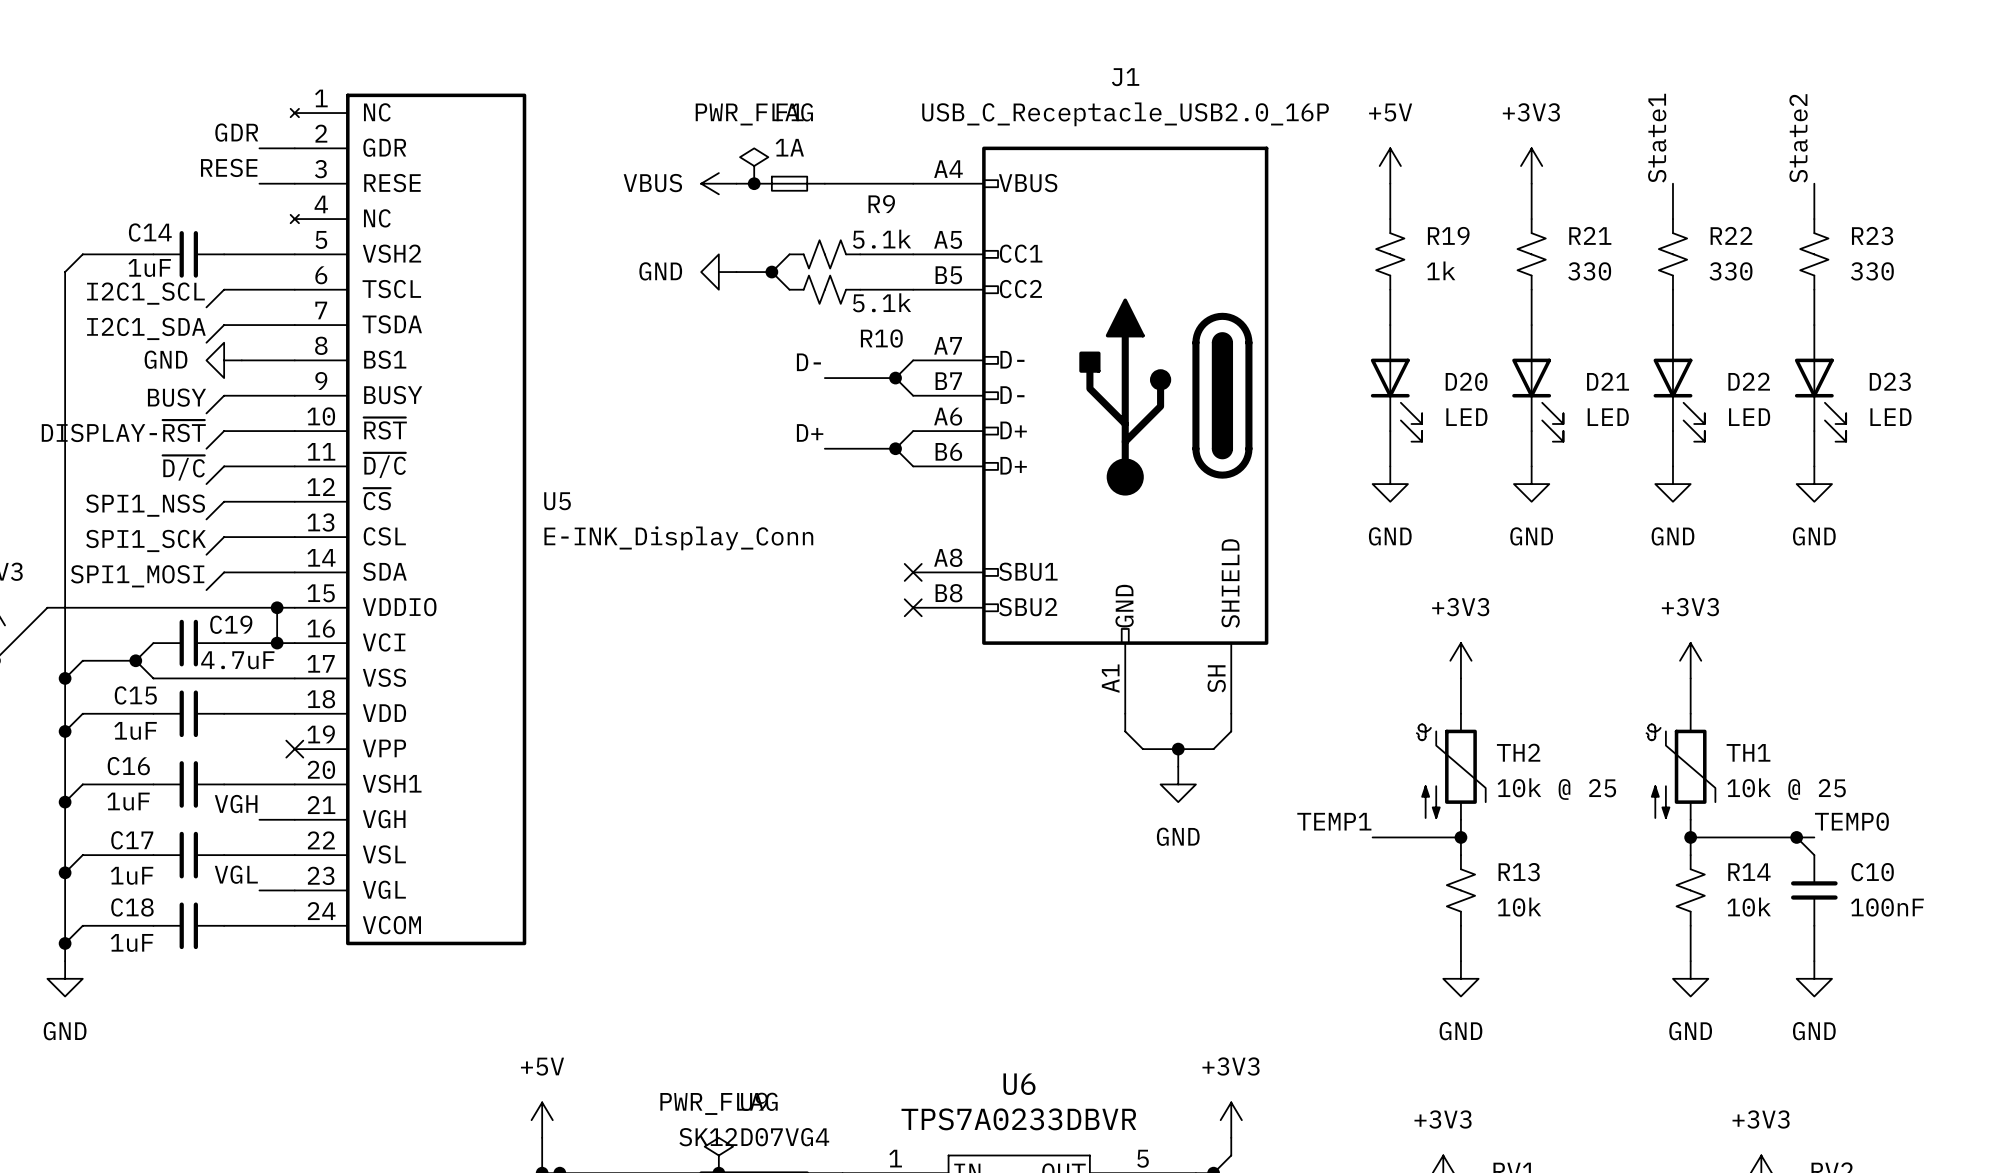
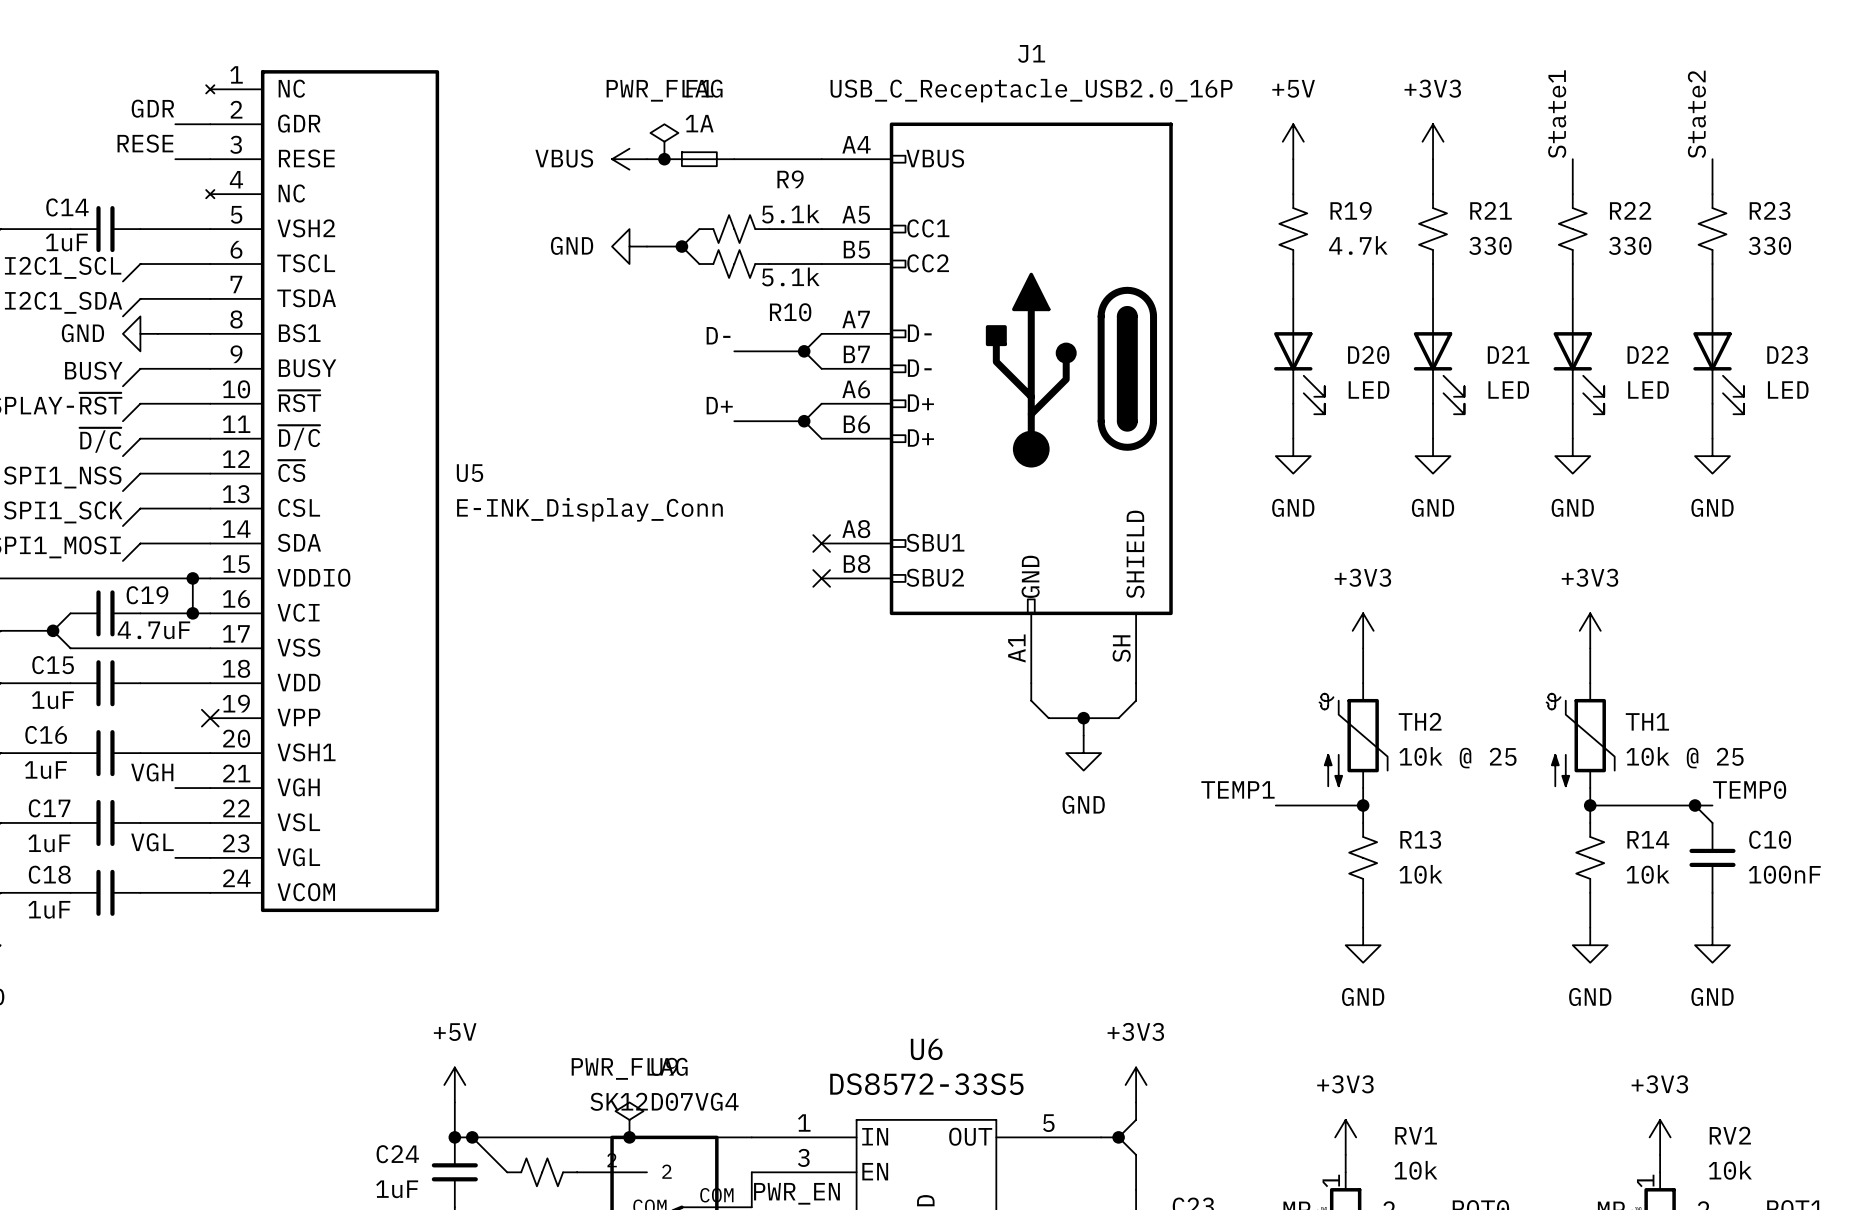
R19 value: 1k (1441, 270) -> 4.7k (1358, 245)
U6 value: TPS7A0233DBVR (1018, 1119) -> DS8572-33S5 (926, 1084)

